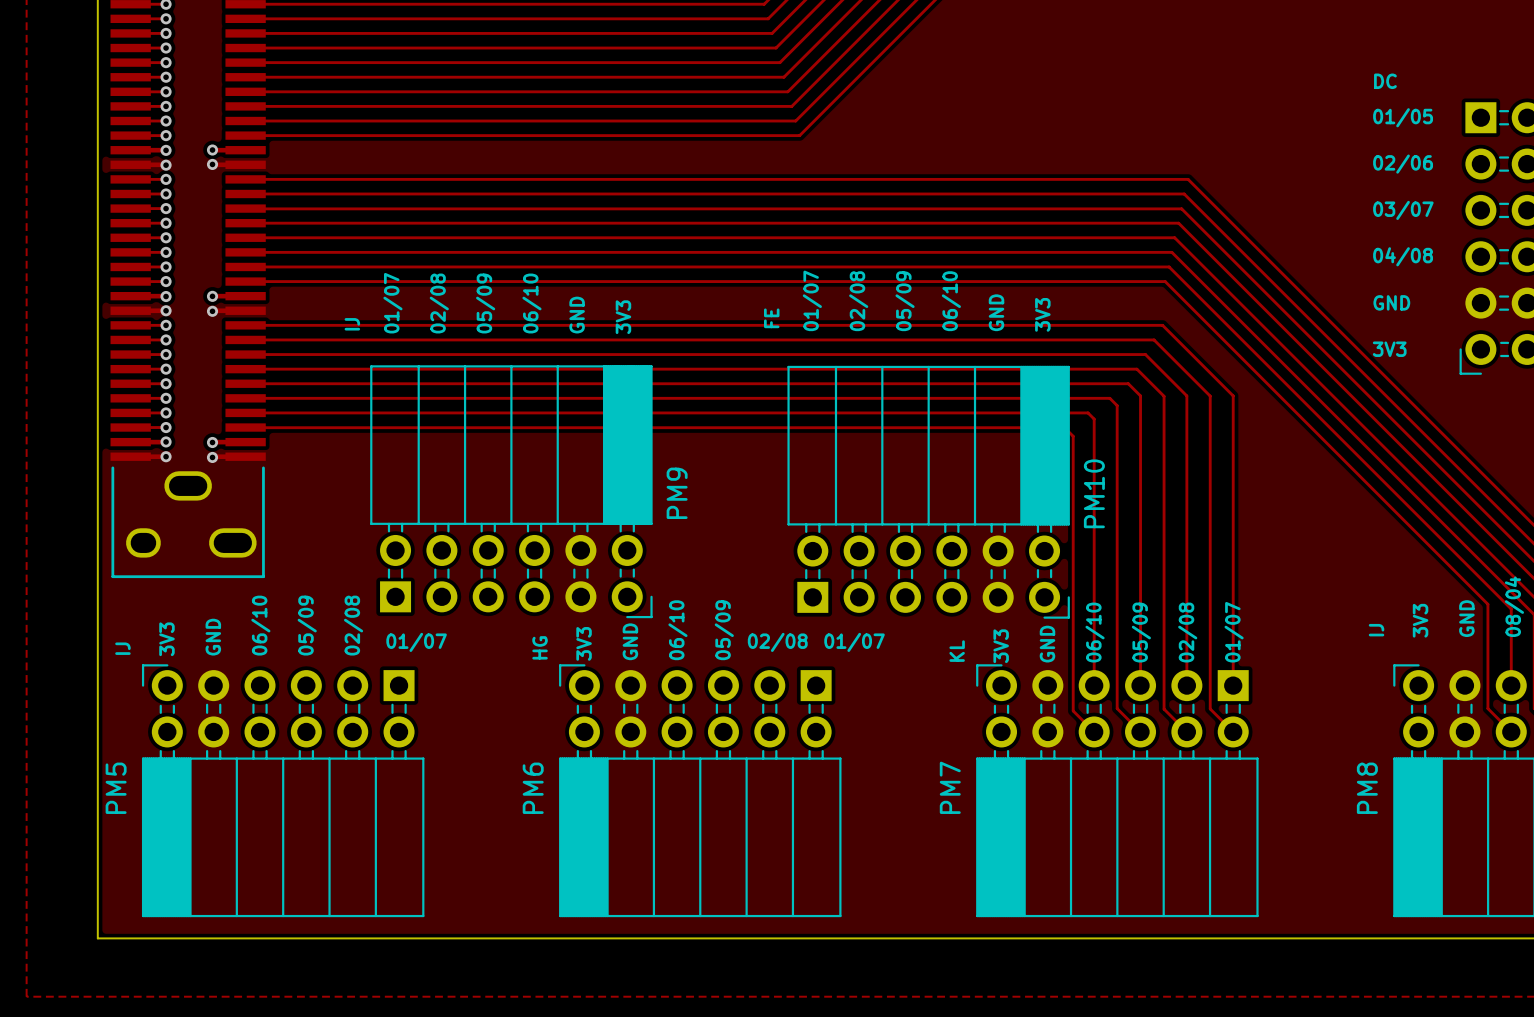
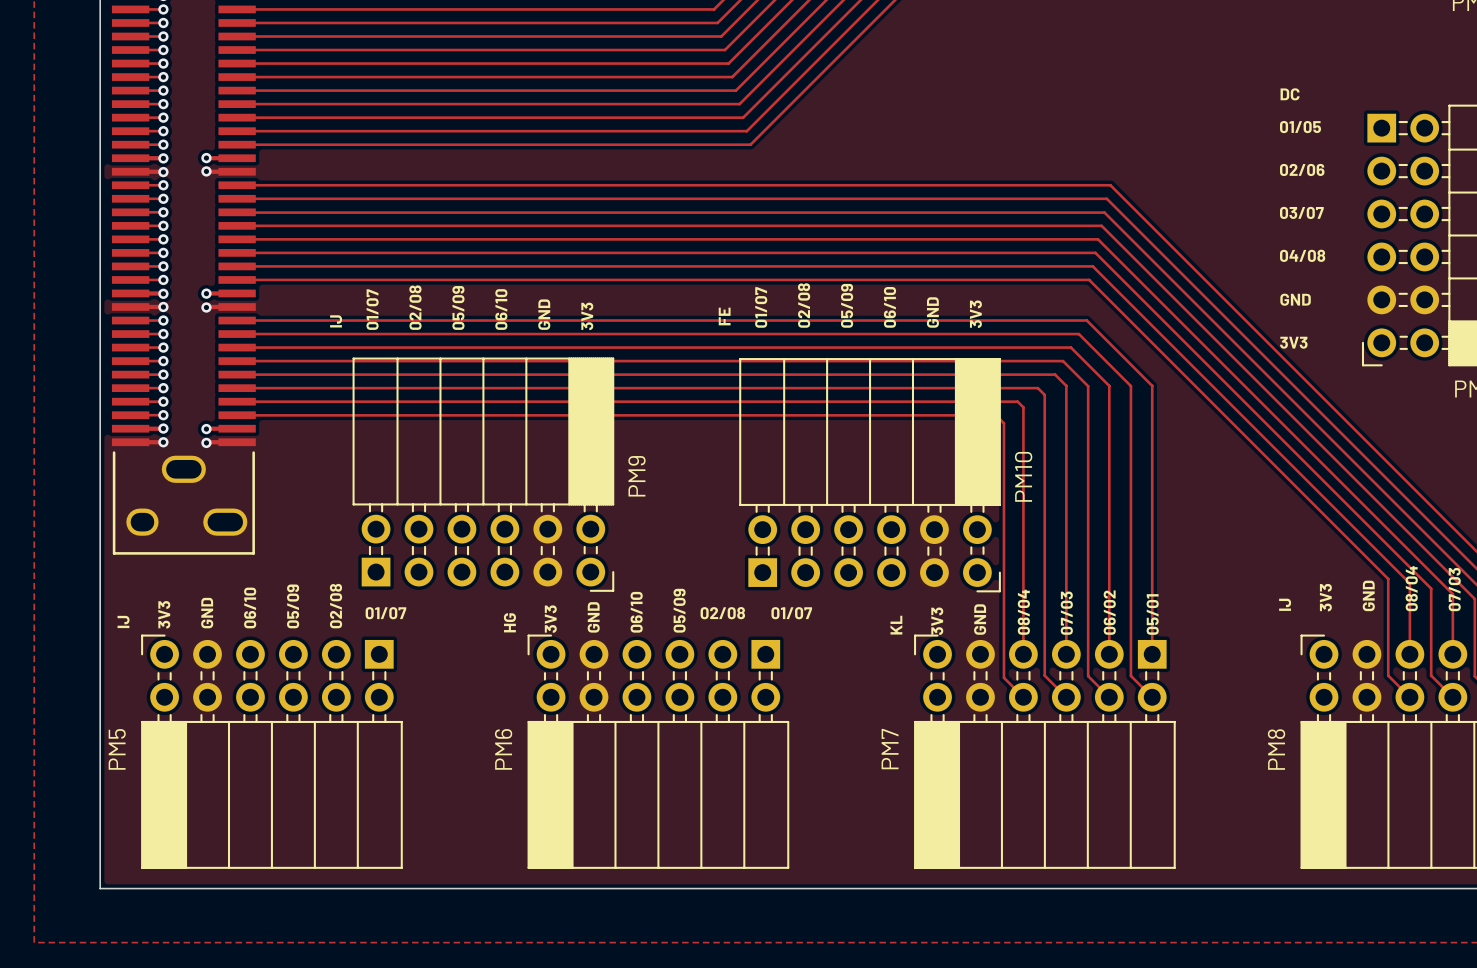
text: 06/10 (1095, 632) -> 08/04 (1023, 612)
text: 05/09 (1141, 632) -> 07/03 (1066, 613)
text: 02/08 (1187, 632) -> 06/02 (1109, 612)
text: 01/07 (1234, 632) -> 05/01 (1152, 614)

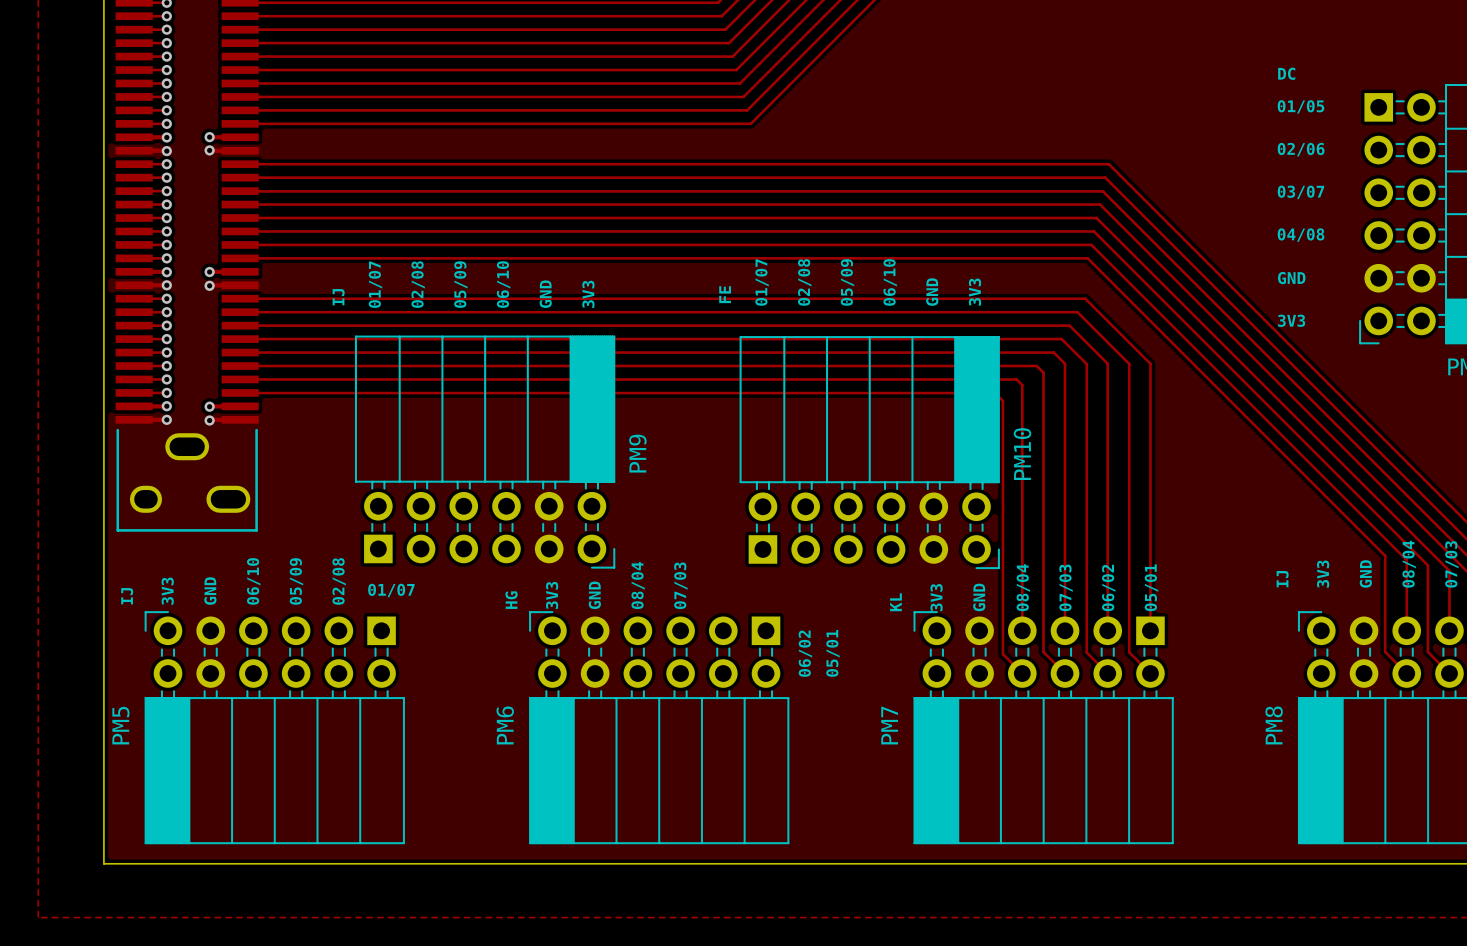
text: 05/09 (679, 610) -> 07/03 (680, 585)
text: 06/10 (636, 612) -> 08/04 (638, 585)
text: 02/08 (722, 613) -> none
text: 01/07 (791, 613) -> none
text: none -> 06/02 (805, 653)
text: none -> 05/01 (832, 653)

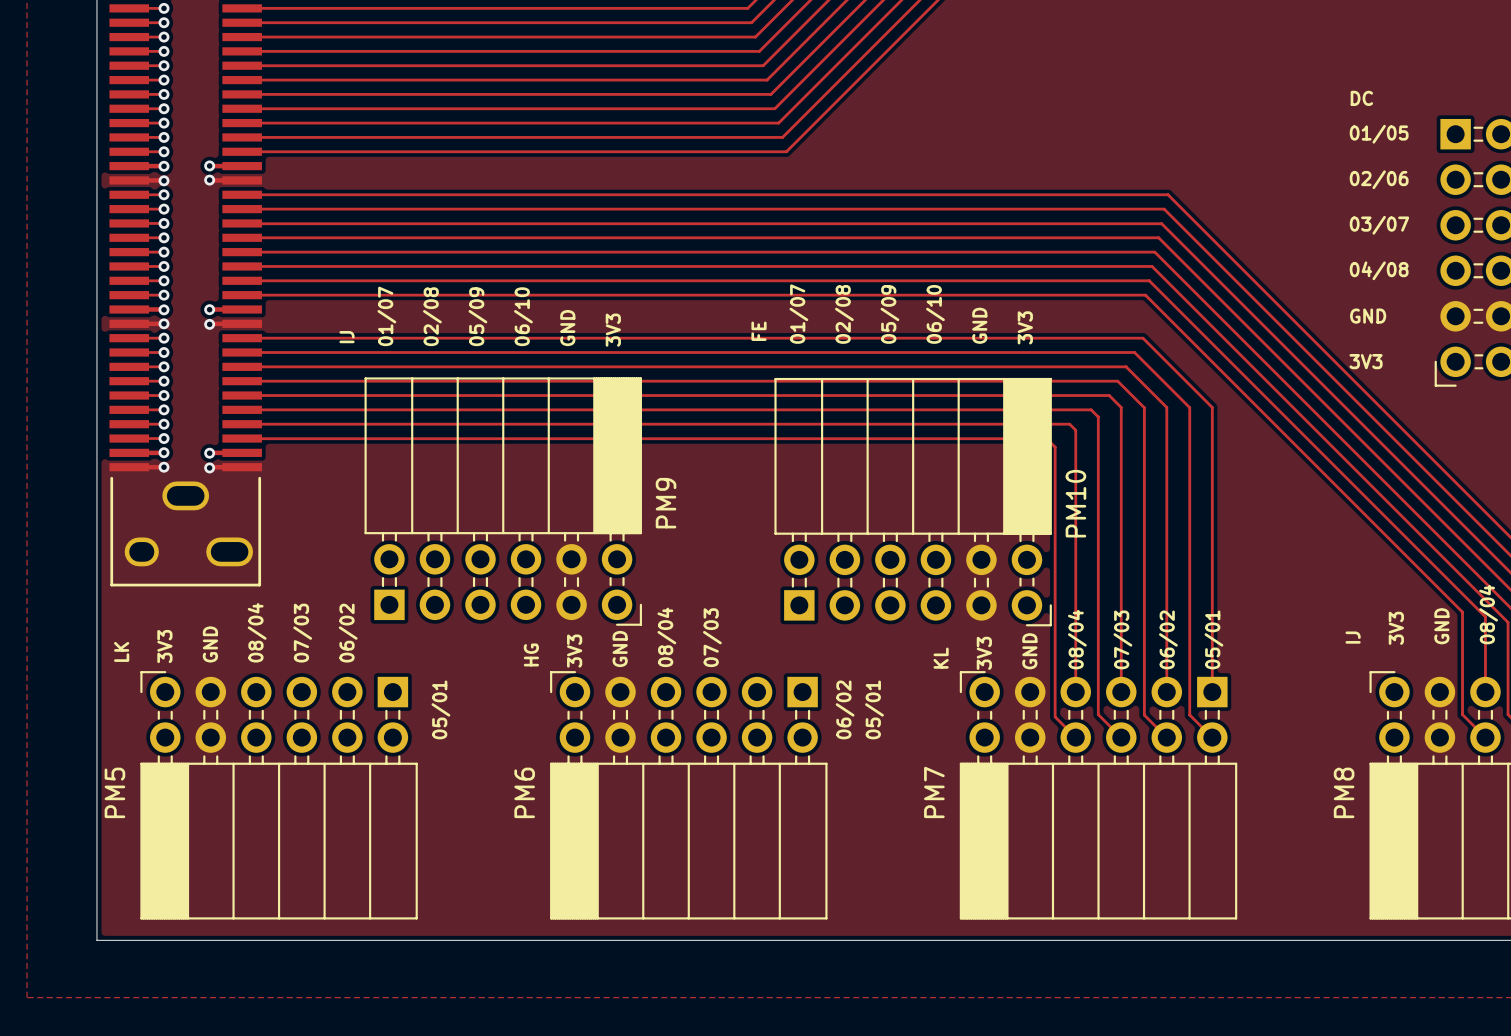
text: 06/10 (253, 581) -> 08/04 (257, 632)
text: 05/09 (296, 581) -> 07/03 (302, 633)
text: 02/08 (339, 581) -> 06/02 (348, 633)
text: 01/07 (391, 590) -> none
text: IJ (127, 596) -> LK (121, 651)
text: none -> 05/01 (440, 709)

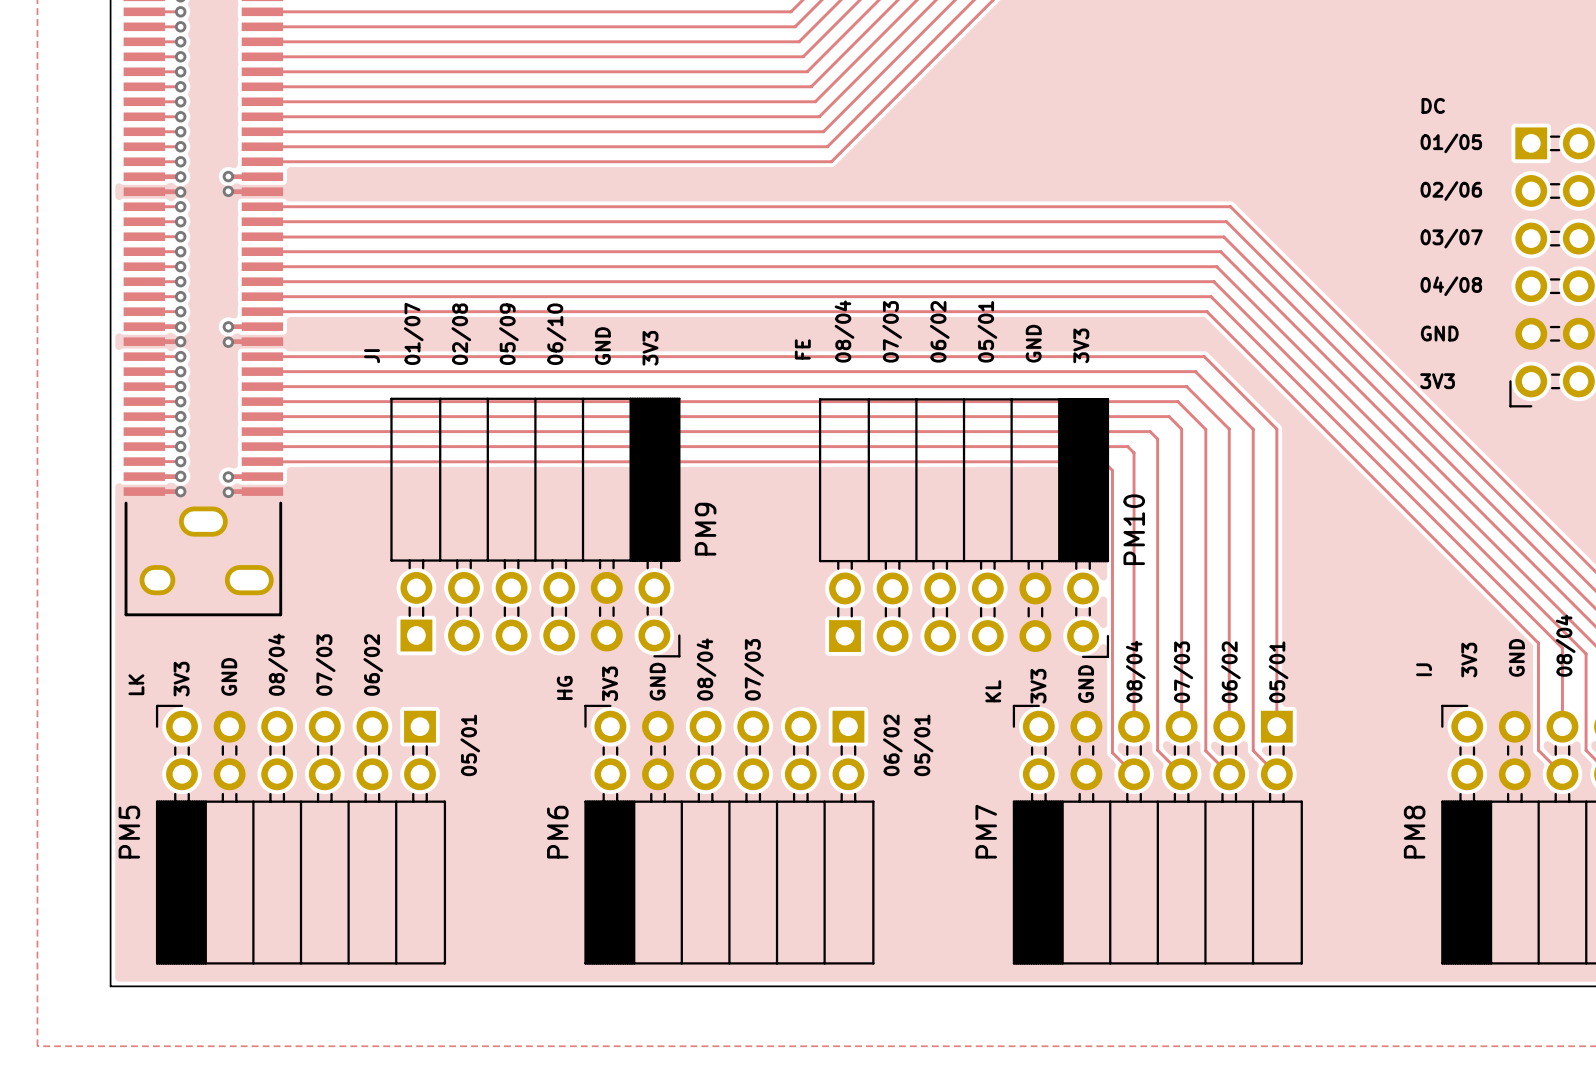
text: 01/07 (798, 314) -> 08/04 (844, 331)
text: 02/08 (844, 314) -> 07/03 (892, 331)
text: 05/09 (889, 314) -> 06/02 (939, 331)
text: 06/10 (935, 314) -> 05/01 (987, 331)
text: IJ (347, 337) -> JI (372, 356)

